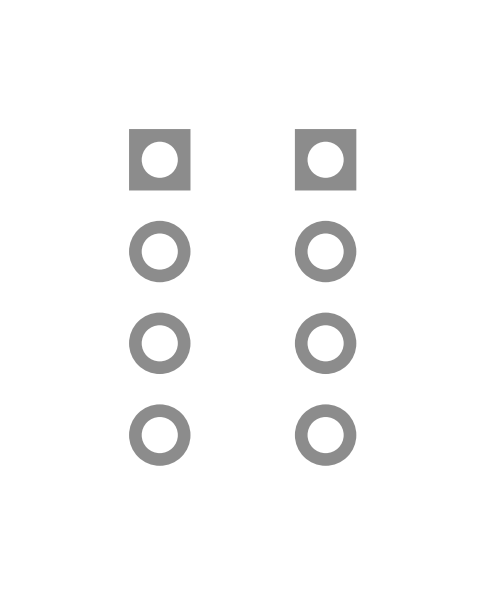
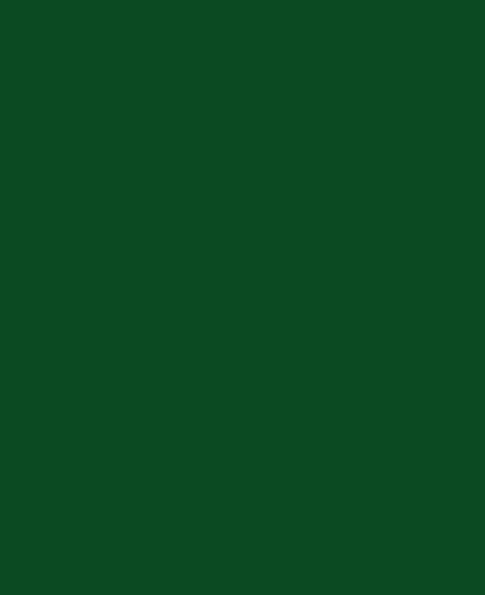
part: (159, 297) -> none
part: (325, 297) -> none

